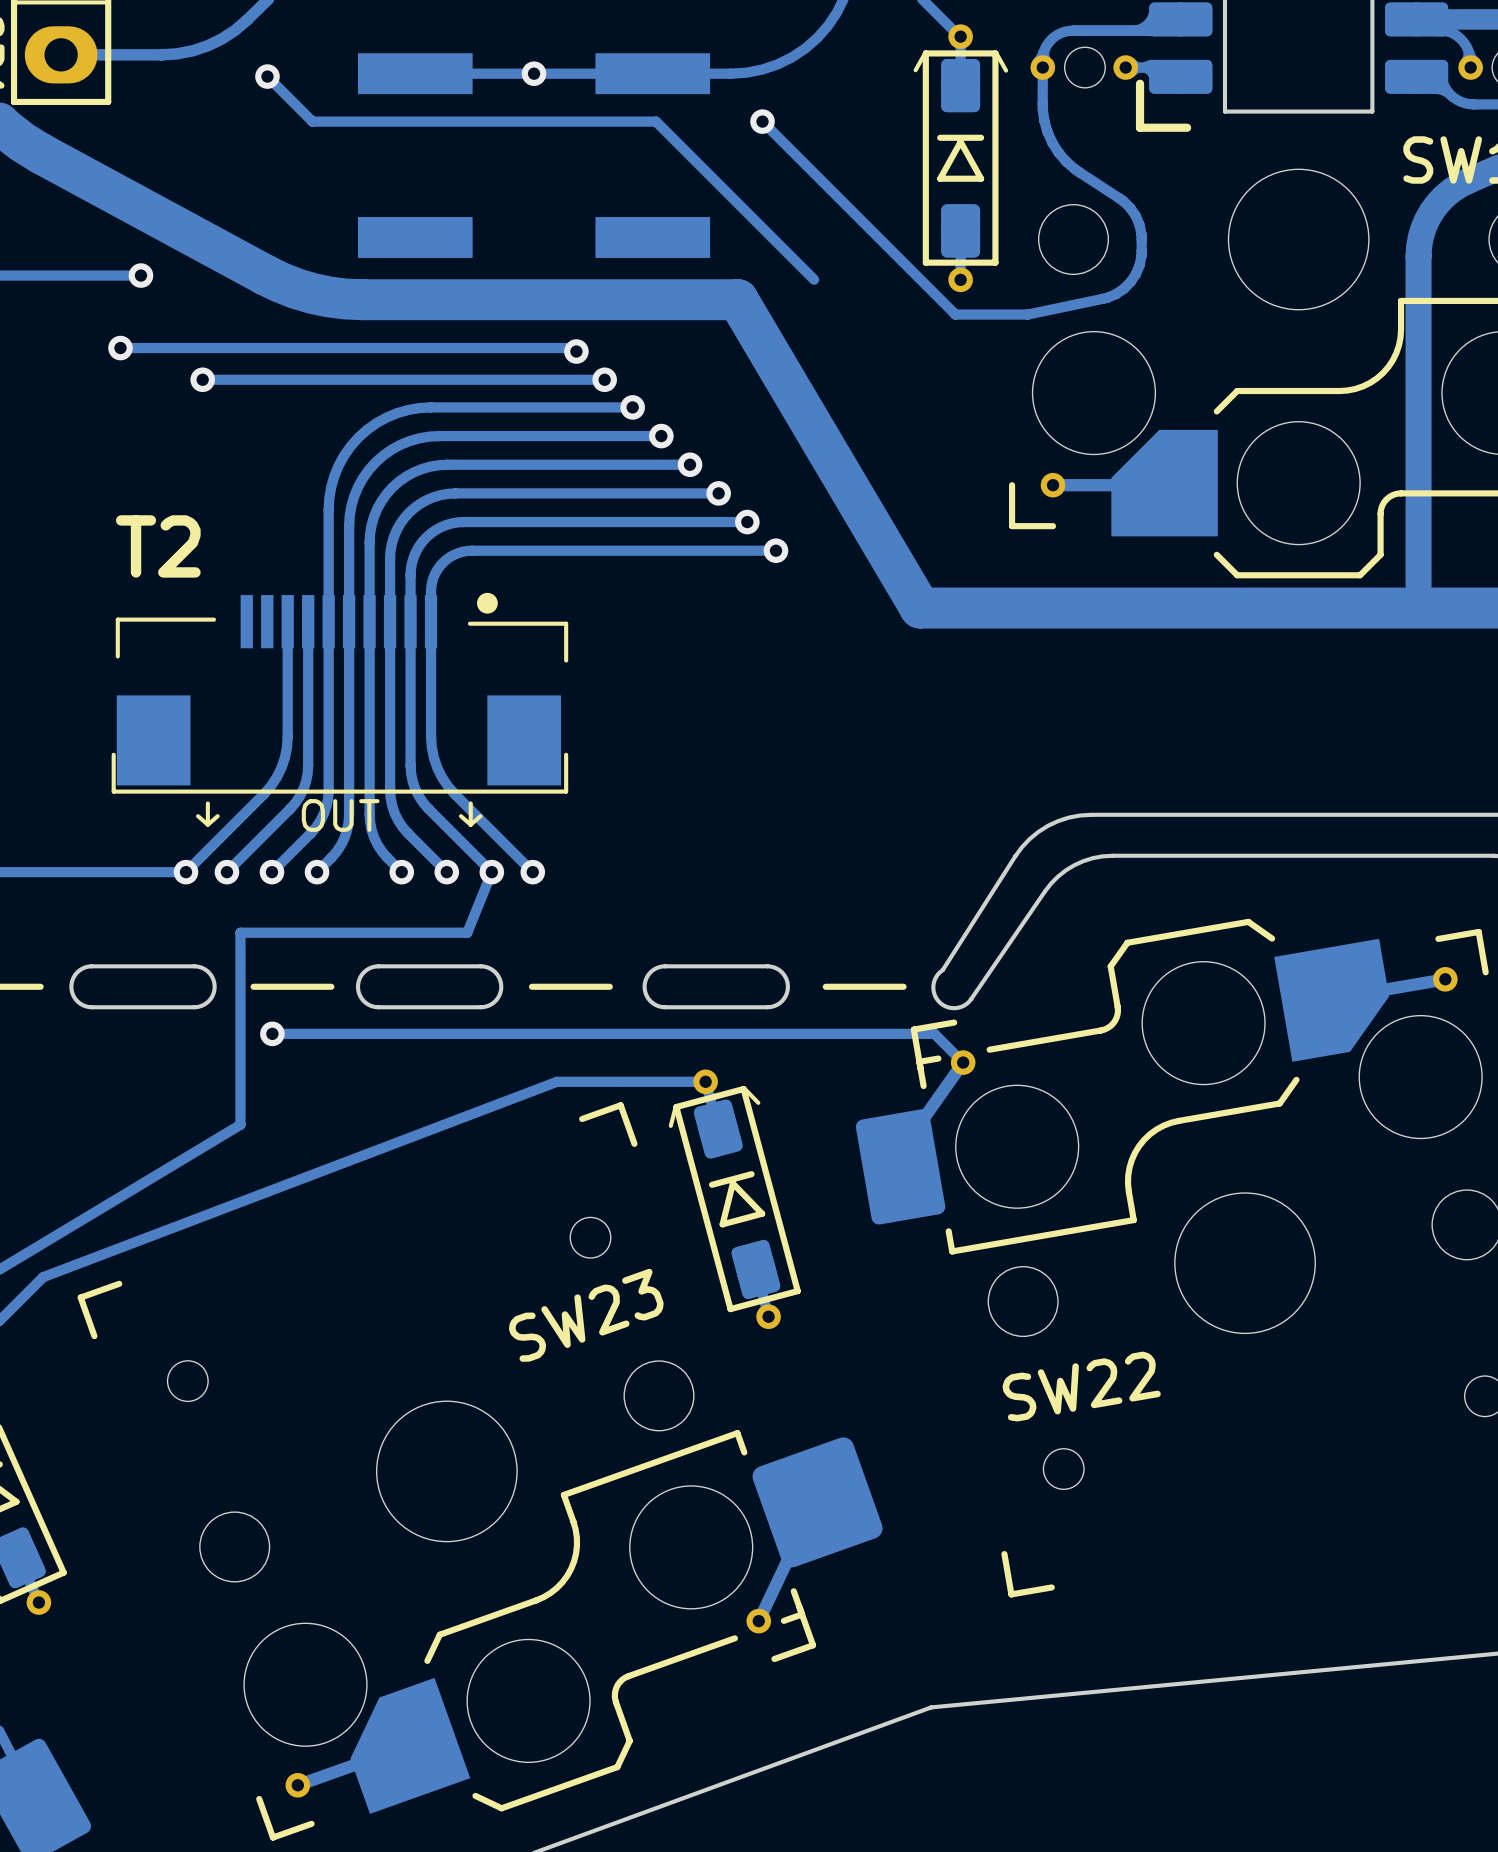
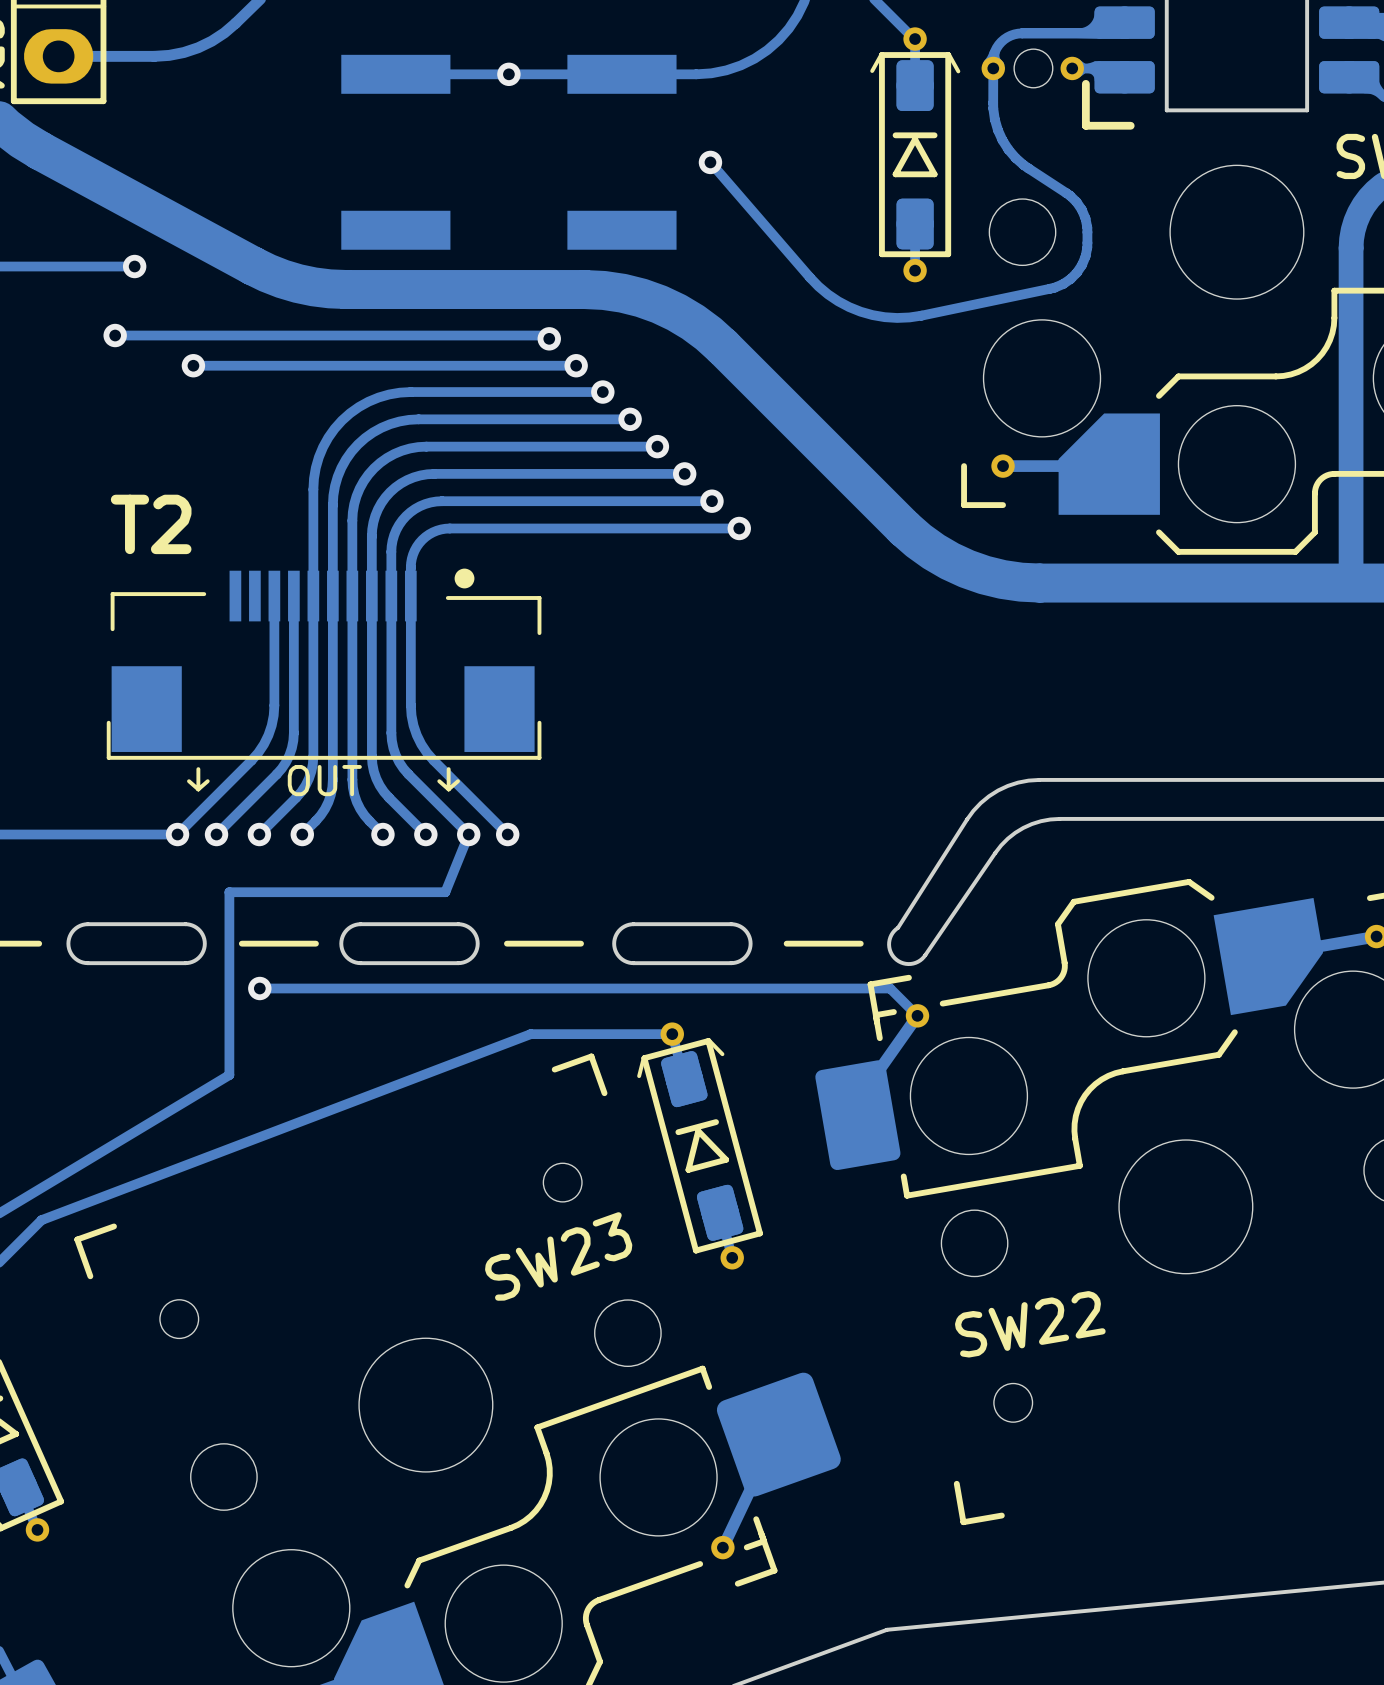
track: (267, 76) (312, 121) (656, 121) (814, 279) -> none
via: (267, 76) -> none
track: (762, 121) (955, 314) (1027, 314) -> (710, 162) (809, 277) (828, 294) (849, 307) (872, 315) (897, 317) (921, 315) (979, 303)
via position: (762, 121) -> (710, 162)
track: (613, 299) (737, 299) (920, 608) (1091, 608) -> (584, 289) (622, 293) (659, 304) (693, 322) (708, 333) (904, 528) (933, 551) (966, 568) (984, 575) (1002, 579) (1039, 583)

